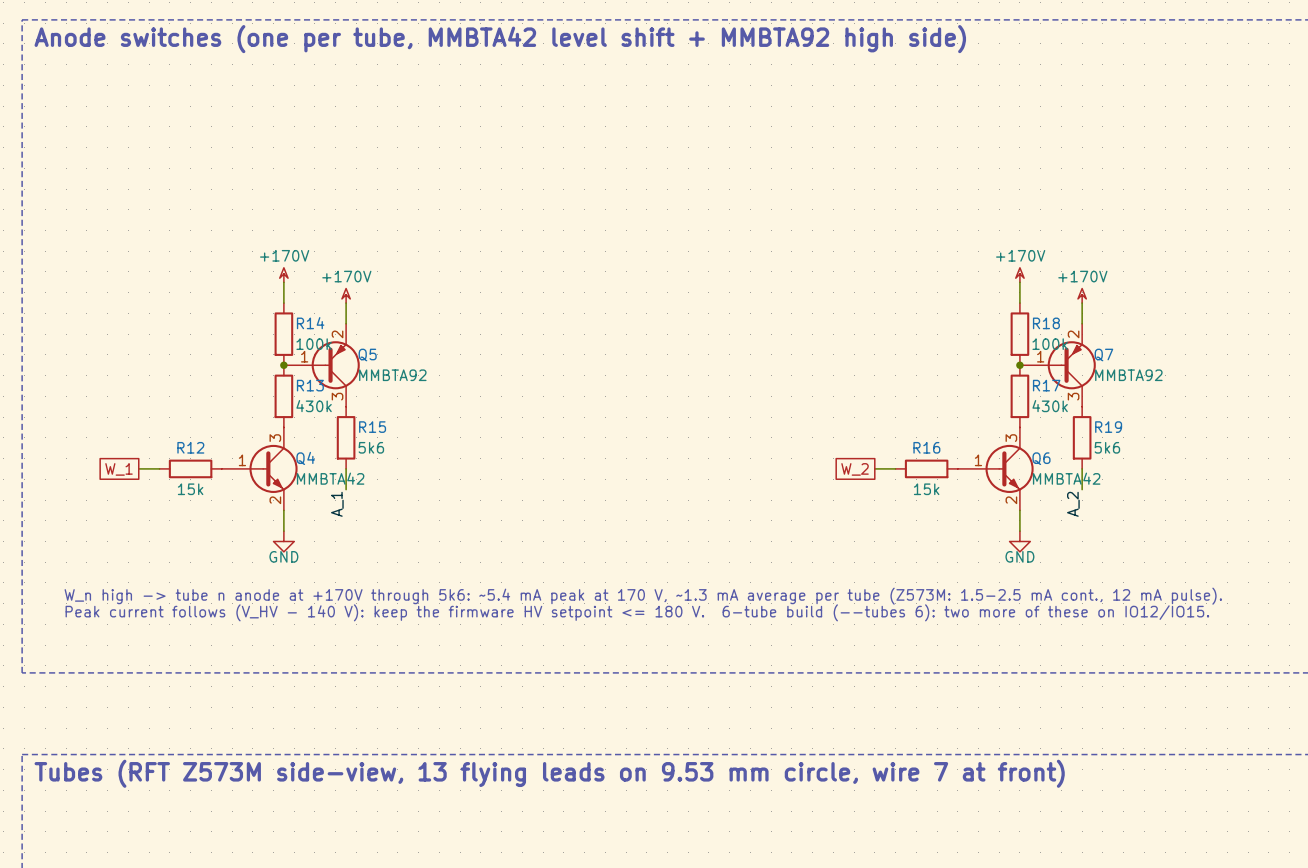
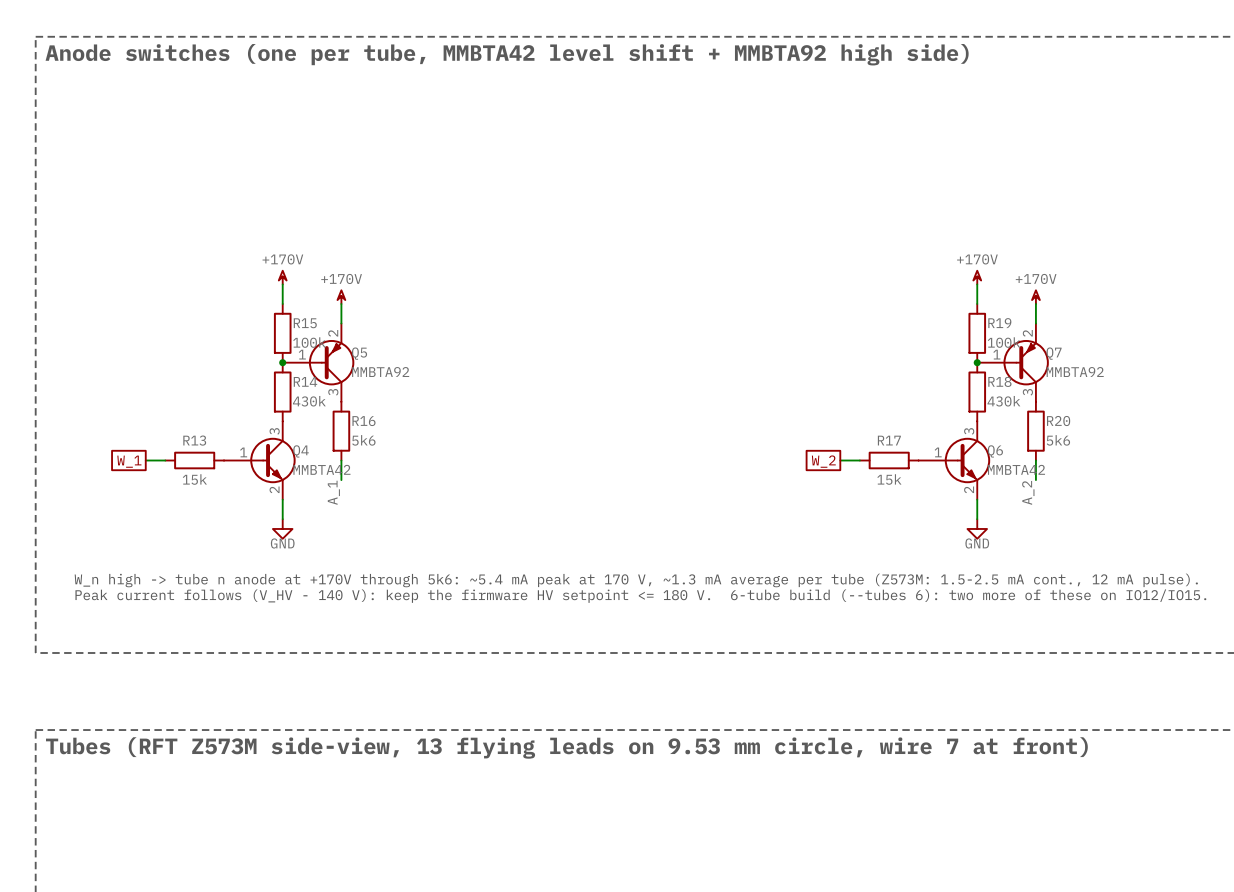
R14 name: R14 (310, 323) -> R15 (305, 323)
R18 name: R18 (1046, 323) -> R19 (999, 323)
R13 name: R13 (310, 385) -> R14 (305, 381)
R17 name: R17 (1046, 385) -> R18 (999, 381)
R15 name: R15 (372, 427) -> R16 (363, 421)
R19 name: R19 (1108, 427) -> R20 (1058, 421)
R12 name: R12 (190, 447) -> R13 (194, 440)
R16 name: R16 (926, 447) -> R17 (889, 440)

